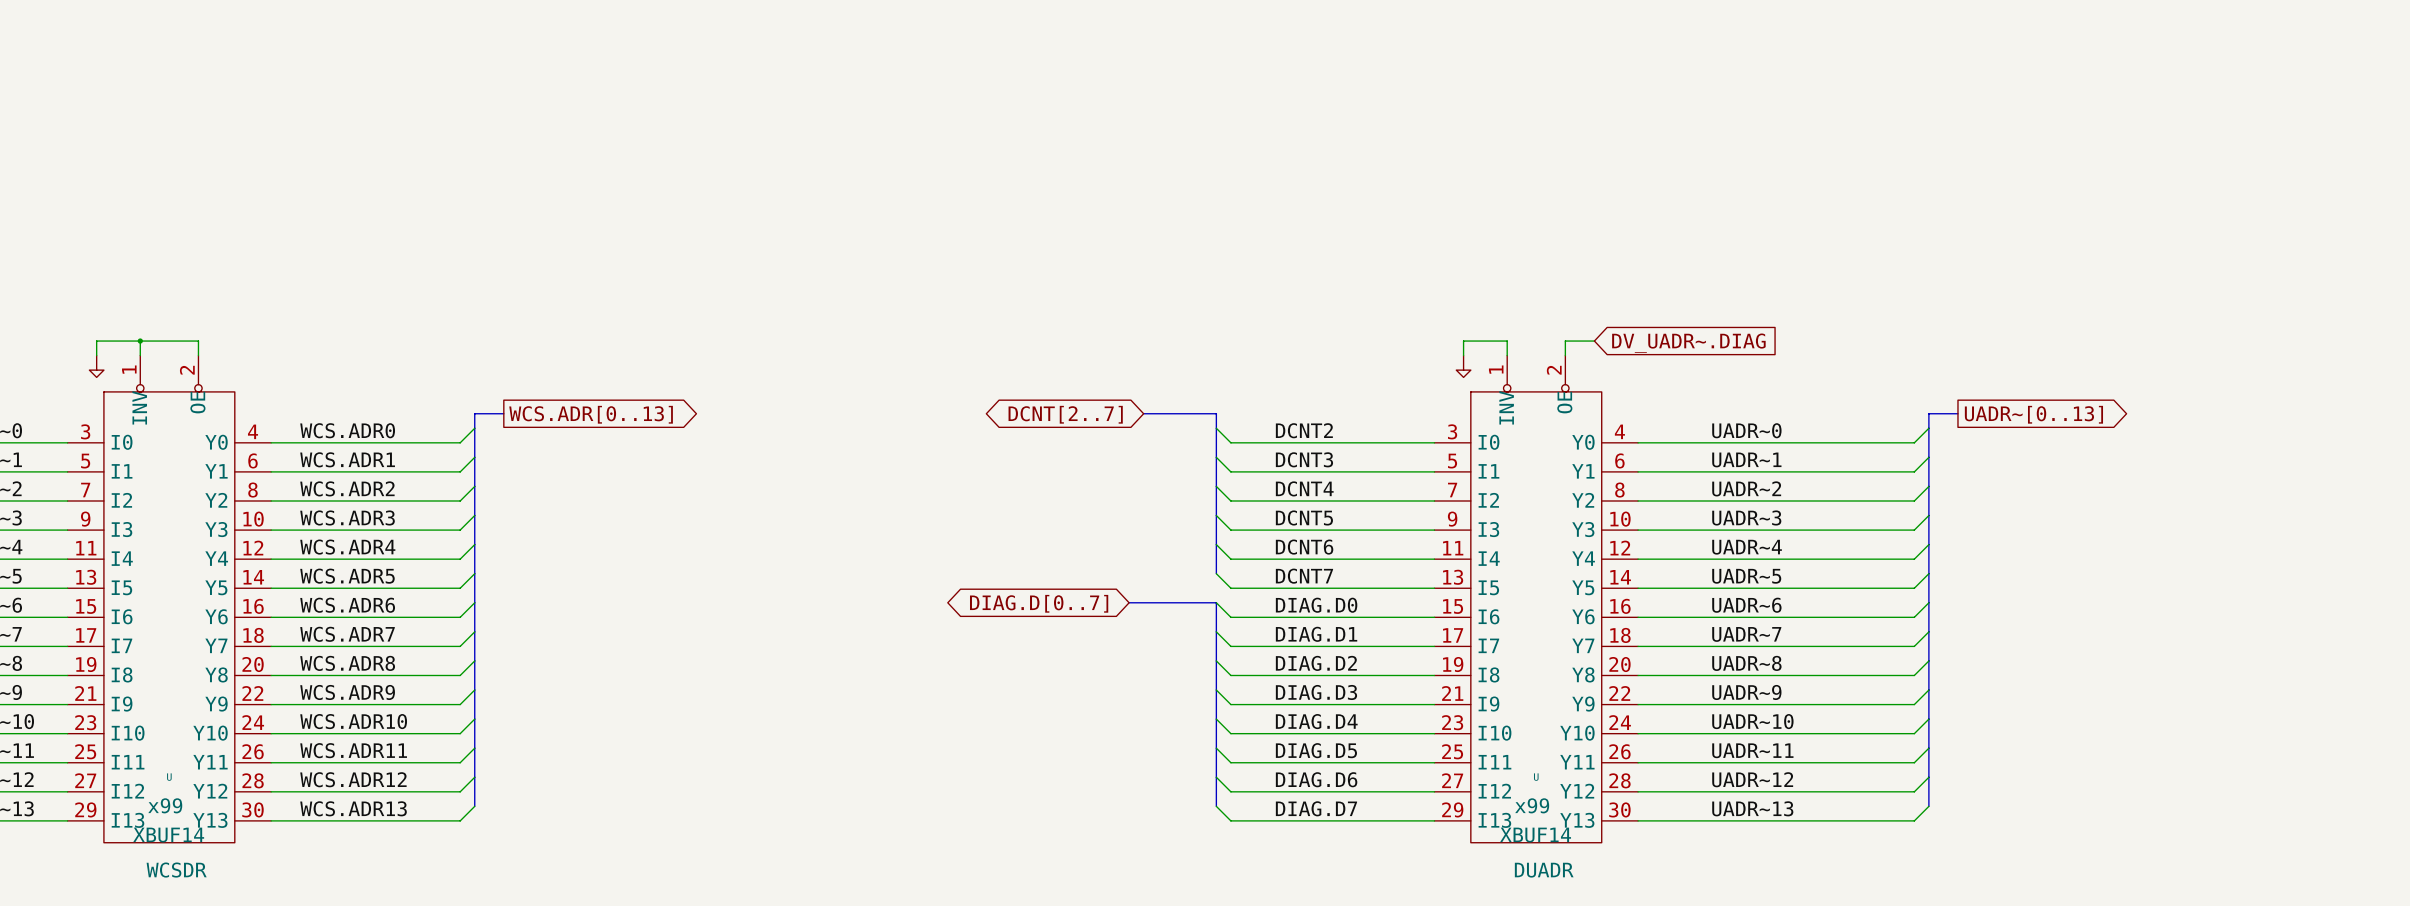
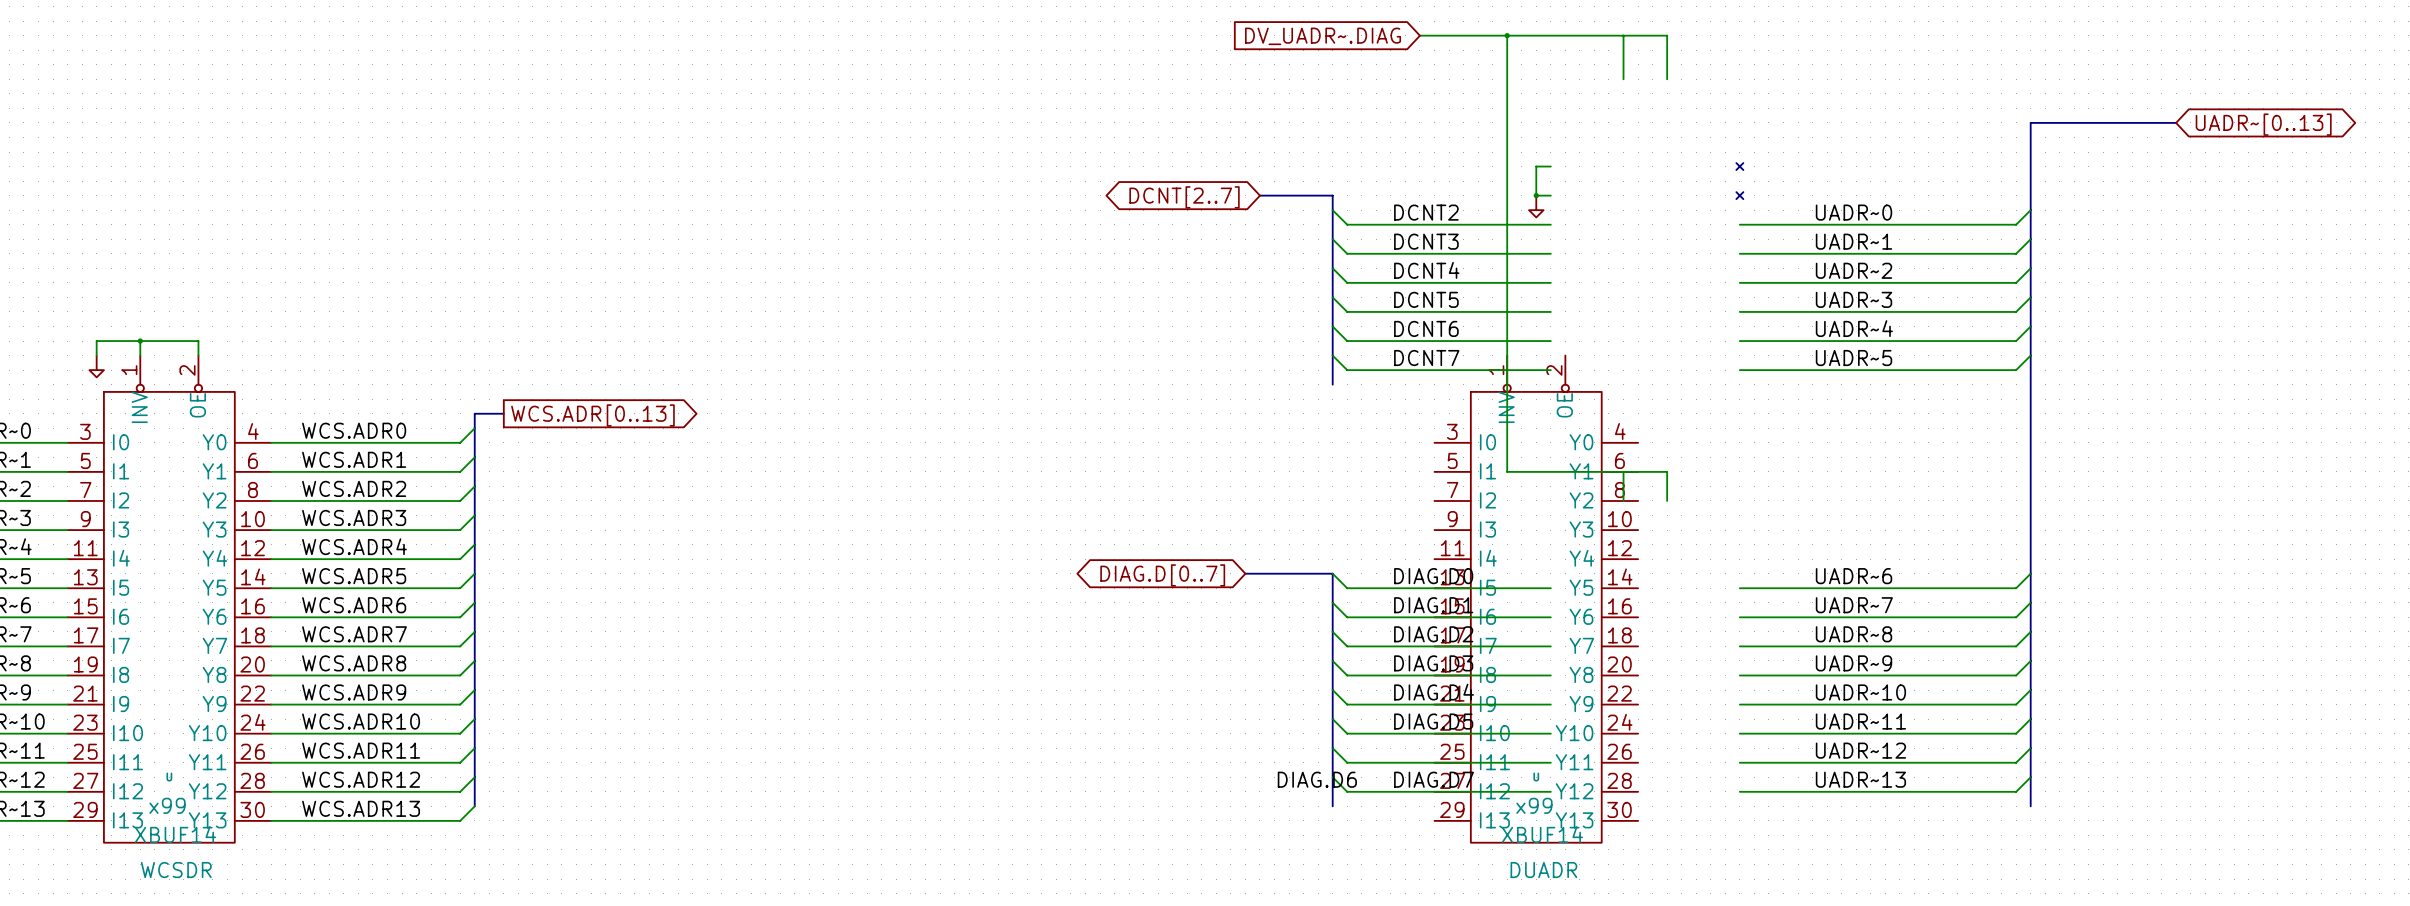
wire: none -> (1419, 35) (1667, 35) (1667, 79)
wire: none -> (1507, 35) (1507, 341) (1550, 341)
junction: none -> (1507, 35)
wire: none -> (1623, 35) (1623, 79)
global label: none -> DV_UADR~.DIAG (1323, 36)
bus: none -> (2176, 122) (2030, 122) (2030, 806)
global label: none -> UADR~[0..13] (2263, 124)
wire: none -> (1550, 166) (1536, 166) (1536, 195) (1550, 195)
no-connect mark: none -> (1739, 166)
bus: none -> (1259, 195) (1332, 195) (1332, 384)
junction: none -> (1536, 195)
no-connect mark: none -> (1739, 195)
global label: none -> DCNT[2..7] (1184, 197)
power symbol: none -> (1536, 206)
wire: none -> (1332, 210) (1347, 224) (1550, 224)
wire: none -> (2030, 210) (2016, 224) (1739, 224)
label: none -> DCNT2 (1426, 212)
label: none -> UADR~0 (1853, 212)
wire: none -> (1332, 239) (1347, 253) (1550, 253)
wire: none -> (2030, 239) (2016, 253) (1739, 253)
label: none -> DCNT3 (1426, 241)
label: none -> UADR~1 (1853, 241)
wire: none -> (1332, 268) (1347, 282) (1550, 282)
wire: none -> (2030, 268) (2016, 282) (1739, 282)
label: none -> DCNT4 (1426, 270)
label: none -> UADR~2 (1853, 270)
wire: none -> (1332, 297) (1347, 311) (1550, 311)
wire: none -> (2030, 297) (2016, 311) (1739, 311)
label: none -> DCNT5 (1426, 299)
label: none -> UADR~3 (1853, 299)
wire: none -> (2030, 326) (2016, 341) (1739, 341)
label: none -> DCNT6 (1426, 328)
label: none -> UADR~4 (1854, 328)
wire: (1463, 341) (1463, 355) -> (1463, 341) (1347, 341) (1332, 326)
wire: (1594, 341) (1565, 341) (1565, 355) -> none
global label: DV_UADR~.DIAG (1688, 343) -> none
wire: none -> (1507, 355) (1507, 471) (1638, 471)
label: none -> DCNT7 (1426, 358)
label: none -> UADR~5 (1853, 358)
power symbol: (1463, 366) -> none
bus: (1143, 413) (1216, 413) (1216, 573) -> none
bus: (1957, 413) (1928, 413) (1928, 806) -> none
global label: DCNT[2..7] (1065, 414) -> none
global label: UADR~[0..13] (2033, 414) -> none
wire: (1216, 428) (1230, 442) (1434, 442) -> (1332, 355) (1347, 370) (1550, 370)
wire: (1928, 428) (1914, 442) (1638, 442) -> (2030, 355) (2016, 370) (1739, 370)
label: DCNT2 (1304, 430) -> none
label: UADR~0 (1746, 430) -> none
wire: (1216, 457) (1230, 471) (1434, 471) -> none
wire: (1928, 457) (1914, 471) (1667, 471) -> (1667, 500) (1667, 471)
label: DCNT3 (1304, 459) -> none
label: UADR~1 (1746, 459) -> none
wire: none -> (1623, 471) (1623, 500)
wire: (1216, 486) (1230, 500) (1434, 500) -> none
wire: (1928, 486) (1914, 500) (1638, 500) -> none
label: DCNT4 (1304, 488) -> none
label: UADR~2 (1746, 488) -> none
wire: (1216, 515) (1230, 530) (1434, 530) -> none
wire: (1928, 515) (1914, 530) (1638, 530) -> none
label: DCNT5 (1304, 517) -> none
label: UADR~3 (1746, 517) -> none
wire: (1216, 544) (1230, 559) (1434, 559) -> none
wire: (1928, 544) (1914, 559) (1638, 559) -> none
label: DCNT6 (1304, 547) -> none
label: UADR~4 (1747, 547) -> none
wire: (1216, 573) (1230, 588) (1347, 588) -> (1332, 573) (1347, 588)
bus: none -> (1245, 573) (1332, 573) (1332, 806)
wire: (1928, 573) (1914, 588) -> (2030, 573) (2016, 588) (1914, 588)
label: DCNT7 (1304, 576) -> none
label: UADR~5 (1746, 576) -> none
wire: none -> (1434, 588) (1550, 588)
wire: (1638, 588) (1739, 588) -> none
bus: (1129, 602) (1216, 602) (1216, 806) -> none
wire: (1216, 602) (1230, 617) (1347, 617) -> (1332, 602) (1347, 617)
wire: (1928, 602) (1914, 617) -> (2030, 602) (2016, 617) (1914, 617)
global label position: DIAG.D[0..7] (1039, 603) -> DIAG.D[0..7] (1162, 575)
label position: DIAG.D0 (1316, 605) -> DIAG.D0 (1433, 576)
label position: UADR~6 (1746, 605) -> UADR~6 (1853, 576)
wire: none -> (1434, 617) (1550, 617)
wire: (1638, 617) (1739, 617) -> none
wire: (1216, 631) (1230, 646) (1347, 646) -> (1332, 631) (1347, 646)
wire: (1928, 631) (1914, 646) -> (2030, 631) (2016, 646) (1914, 646)
label position: DIAG.D1 (1316, 634) -> DIAG.D1 (1433, 605)
label position: UADR~7 (1746, 634) -> UADR~7 (1854, 605)
wire: none -> (1434, 646) (1550, 646)
wire: (1638, 646) (1739, 646) -> none
wire: (1216, 660) (1230, 675) (1347, 675) -> (1332, 660) (1347, 675)
wire: (1928, 660) (1914, 675) -> (2030, 660) (2016, 675) (1914, 675)
label position: DIAG.D2 (1316, 663) -> DIAG.D2 (1433, 634)
label position: UADR~8 (1746, 663) -> UADR~8 (1853, 634)
wire: none -> (1434, 675) (1550, 675)
wire: (1638, 675) (1739, 675) -> none
wire: (1216, 690) (1230, 704) (1347, 704) -> (1332, 690) (1347, 704)
wire: (1928, 690) (1914, 704) -> (2030, 690) (2016, 704) (1914, 704)
label position: DIAG.D3 (1316, 692) -> DIAG.D3 (1433, 663)
label position: UADR~9 (1746, 692) -> UADR~9 (1853, 663)
wire: none -> (1434, 704) (1550, 704)
wire: (1638, 704) (1739, 704) -> none
wire: (1216, 719) (1230, 733) (1347, 733) -> (1332, 719) (1347, 733)
wire: (1928, 719) (1914, 733) -> (2030, 719) (2016, 733) (1914, 733)
label position: DIAG.D4 (1316, 721) -> DIAG.D4 (1434, 692)
label position: UADR~10 (1752, 721) -> UADR~10 (1860, 692)
wire: none -> (1434, 733) (1550, 733)
wire: (1638, 733) (1739, 733) -> none
wire: (1216, 748) (1230, 762) (1347, 762) -> (1332, 748) (1347, 762)
wire: (1928, 748) (1914, 762) -> (2030, 748) (2016, 762) (1914, 762)
label position: DIAG.D5 (1316, 750) -> DIAG.D5 (1433, 721)
label position: UADR~11 (1752, 750) -> UADR~11 (1860, 721)
wire: none -> (1434, 762) (1550, 762)
wire: (1638, 762) (1739, 762) -> none
wire: (1216, 777) (1230, 791) (1347, 791) -> (1332, 777) (1347, 791)
wire: (1928, 777) (1914, 791) -> (2030, 777) (2016, 791) (1914, 791)
label position: UADR~12 (1752, 779) -> UADR~12 (1860, 750)
wire: none -> (1434, 791) (1550, 791)
wire: (1638, 791) (1739, 791) -> none
wire: (1216, 806) (1230, 820) (1434, 820) -> none
wire: (1928, 806) (1914, 820) (1638, 820) -> none
label position: DIAG.D7 (1316, 808) -> DIAG.D7 (1434, 779)
label position: UADR~13 (1752, 808) -> UADR~13 (1860, 779)

